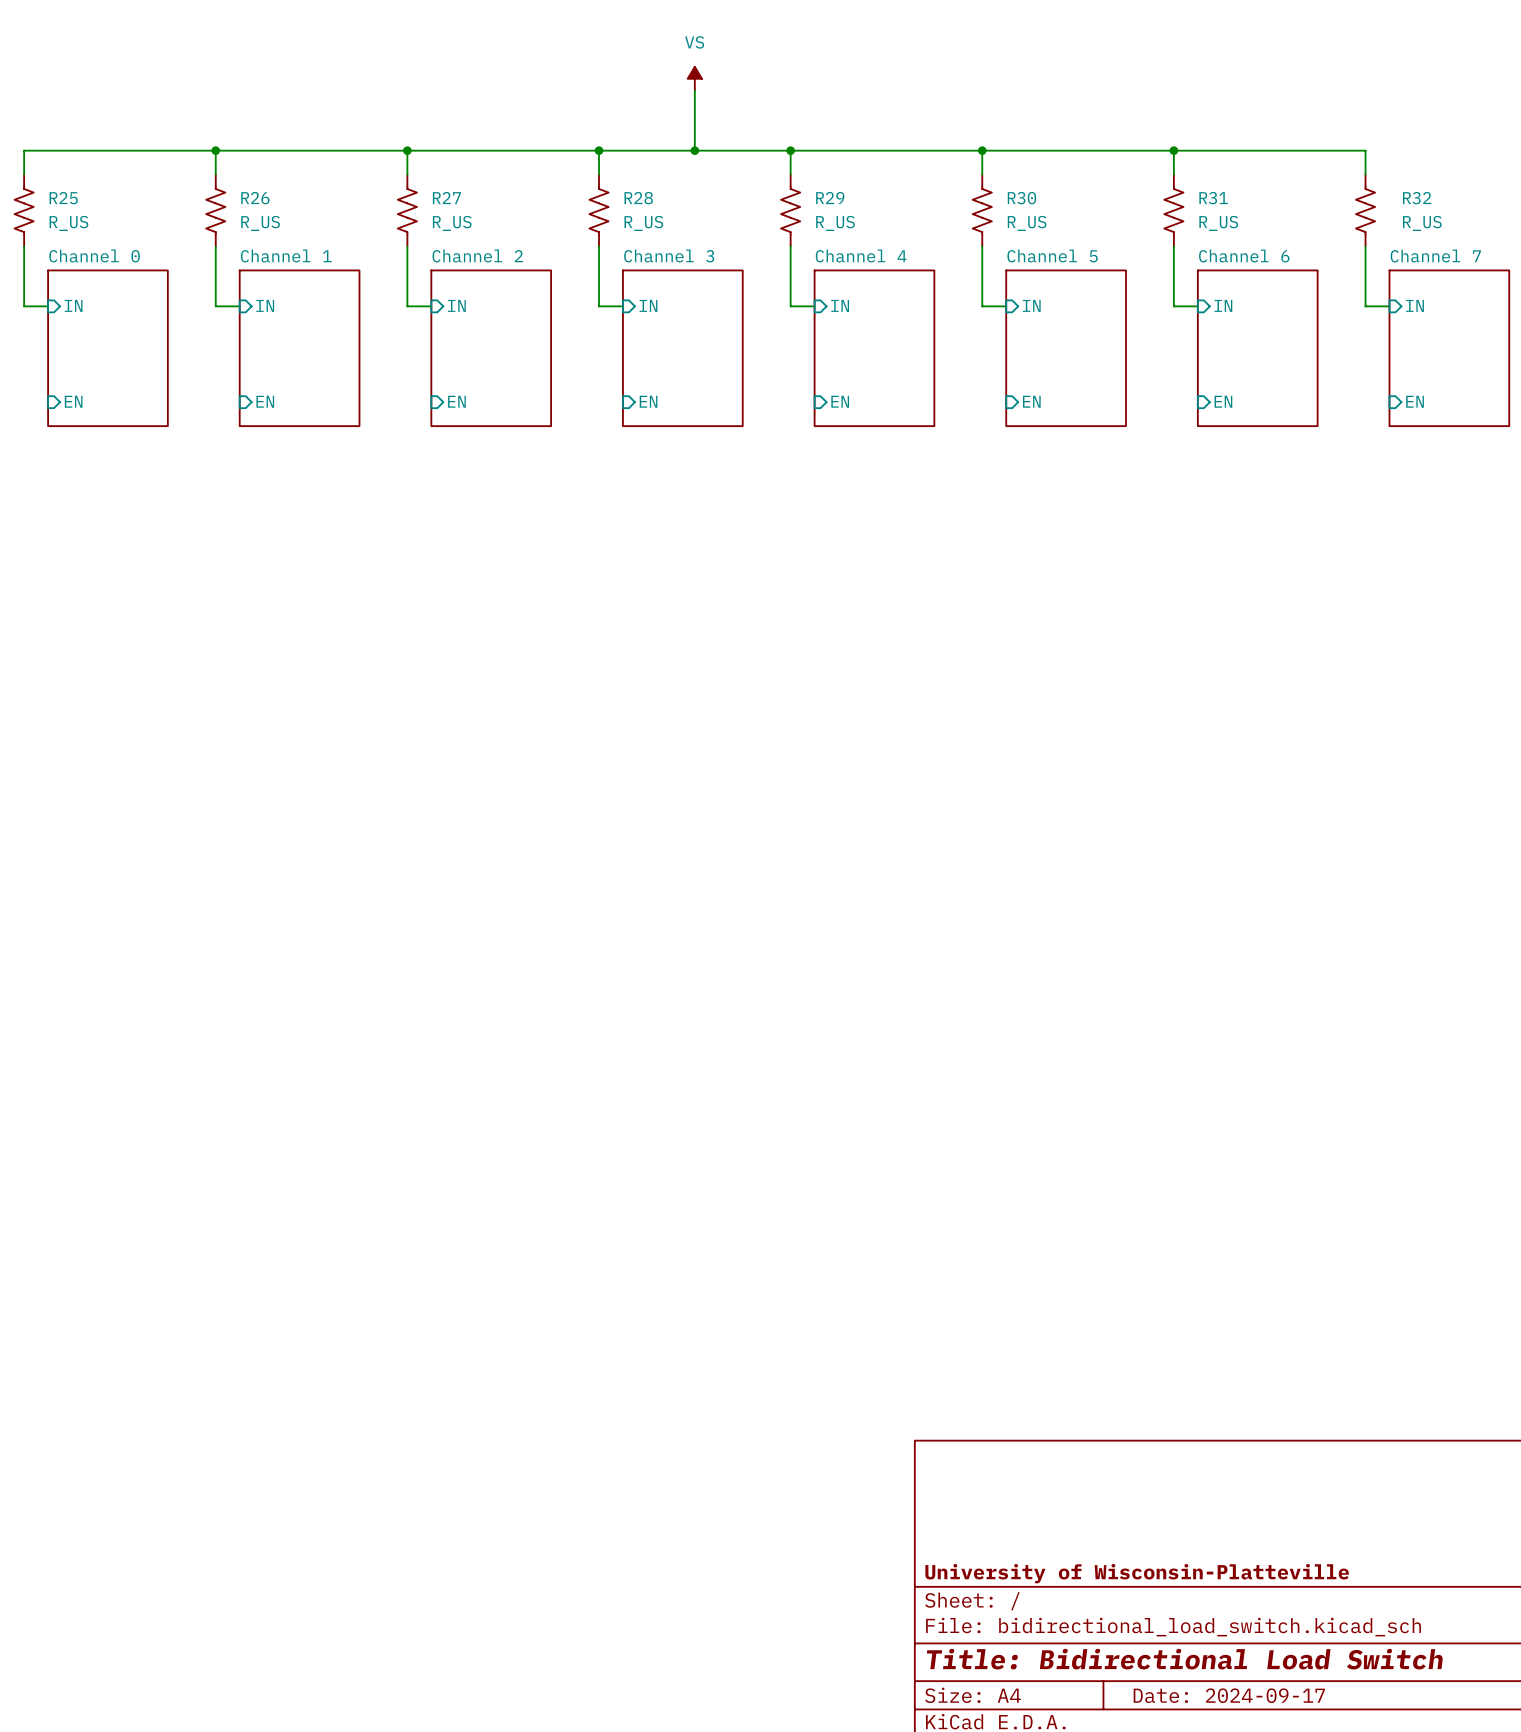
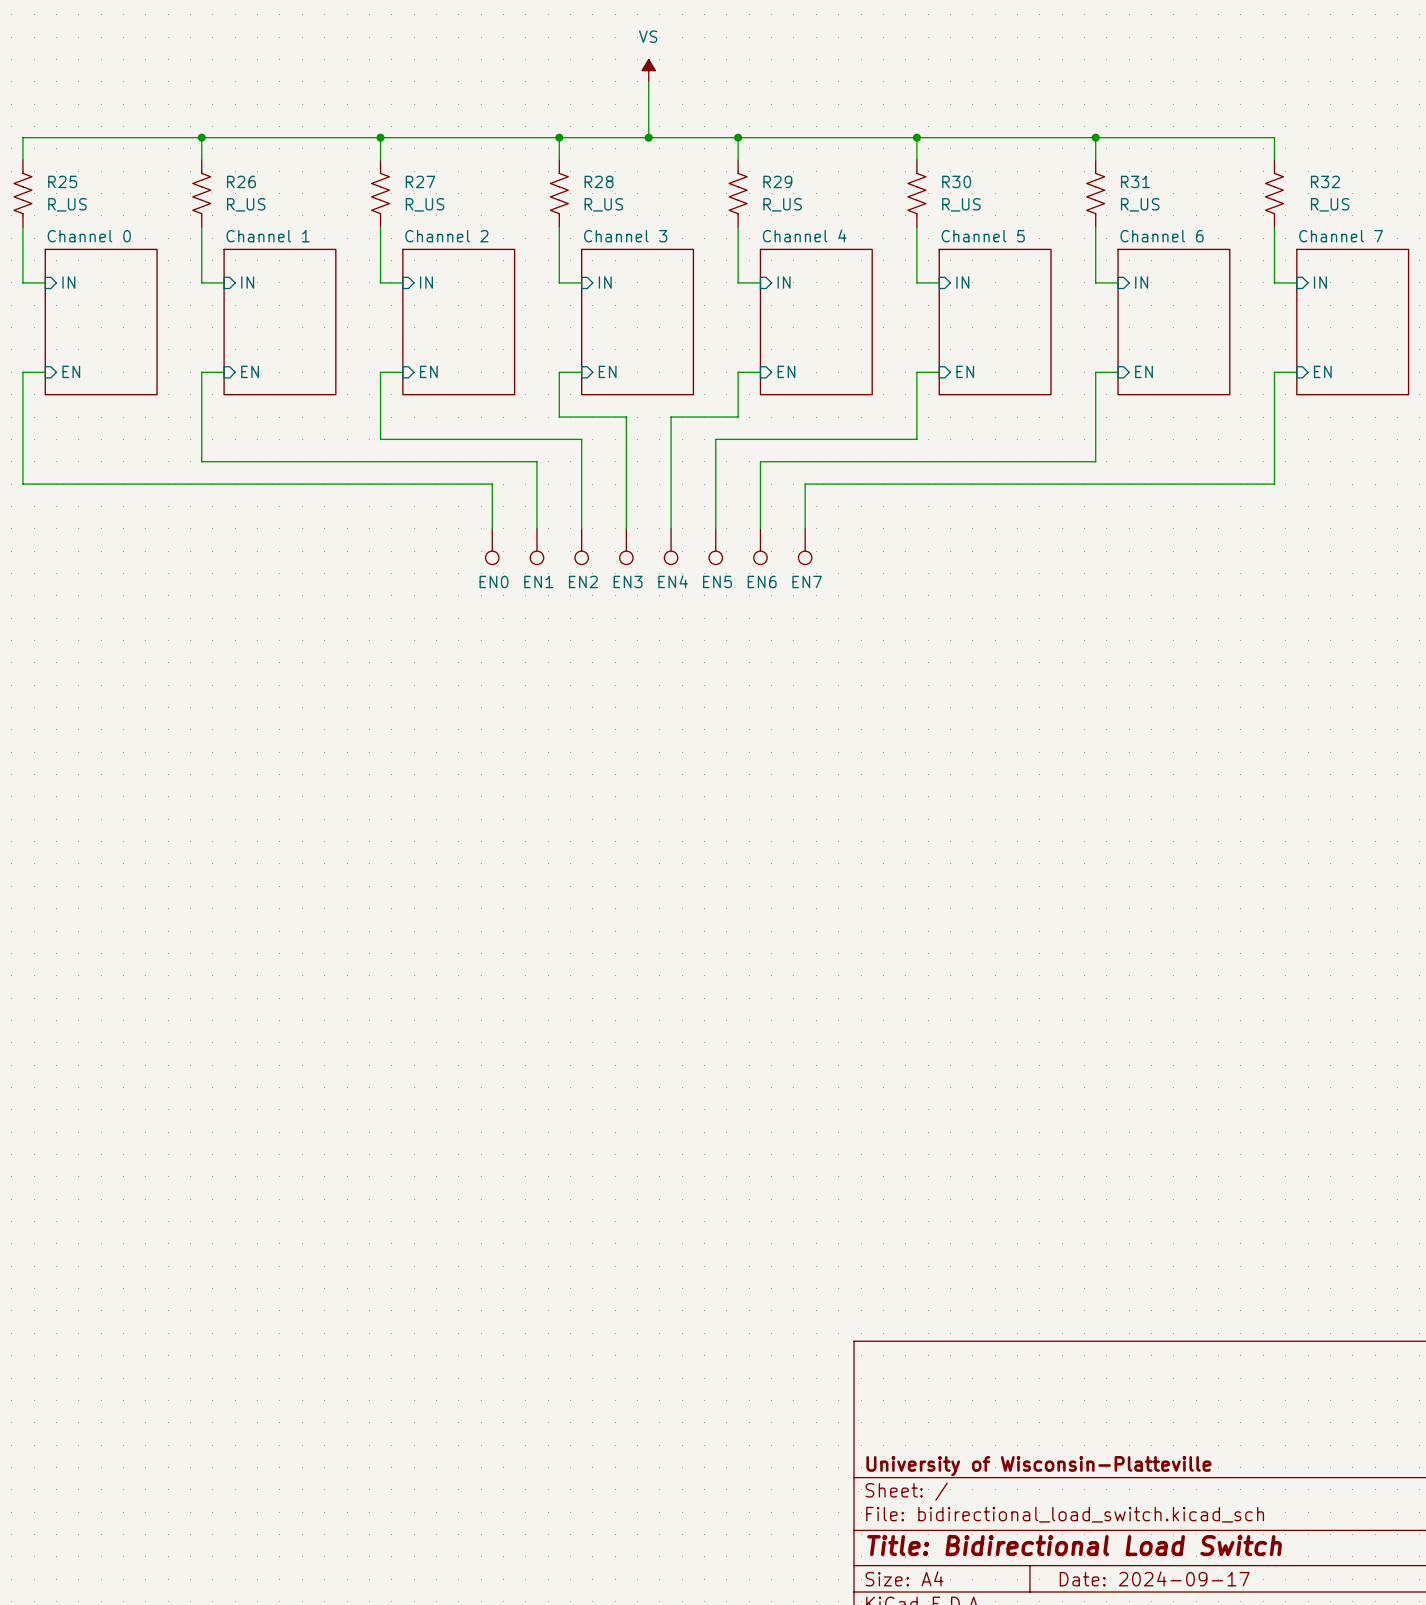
wire: none -> (45, 372) (22, 372) (22, 484) (492, 484) (492, 528)
wire: none -> (224, 372) (201, 372) (201, 461) (536, 461) (536, 528)
wire: none -> (402, 372) (380, 372) (380, 439) (581, 439) (581, 528)
wire: none -> (581, 372) (559, 372) (559, 417) (626, 417) (626, 528)
wire: none -> (760, 372) (738, 372) (738, 417) (671, 417) (671, 528)
wire: none -> (939, 372) (916, 372) (916, 439) (715, 439) (715, 528)
wire: none -> (1118, 372) (1095, 372) (1095, 461) (760, 461) (760, 528)
wire: none -> (1296, 372) (1274, 372) (1274, 484) (805, 484) (805, 528)
EN0: none -> (492, 546)
EN1: none -> (536, 546)
EN2: none -> (581, 546)
EN3: none -> (626, 546)
EN4: none -> (671, 546)
EN5: none -> (715, 546)
EN6: none -> (760, 546)
EN7: none -> (805, 546)

